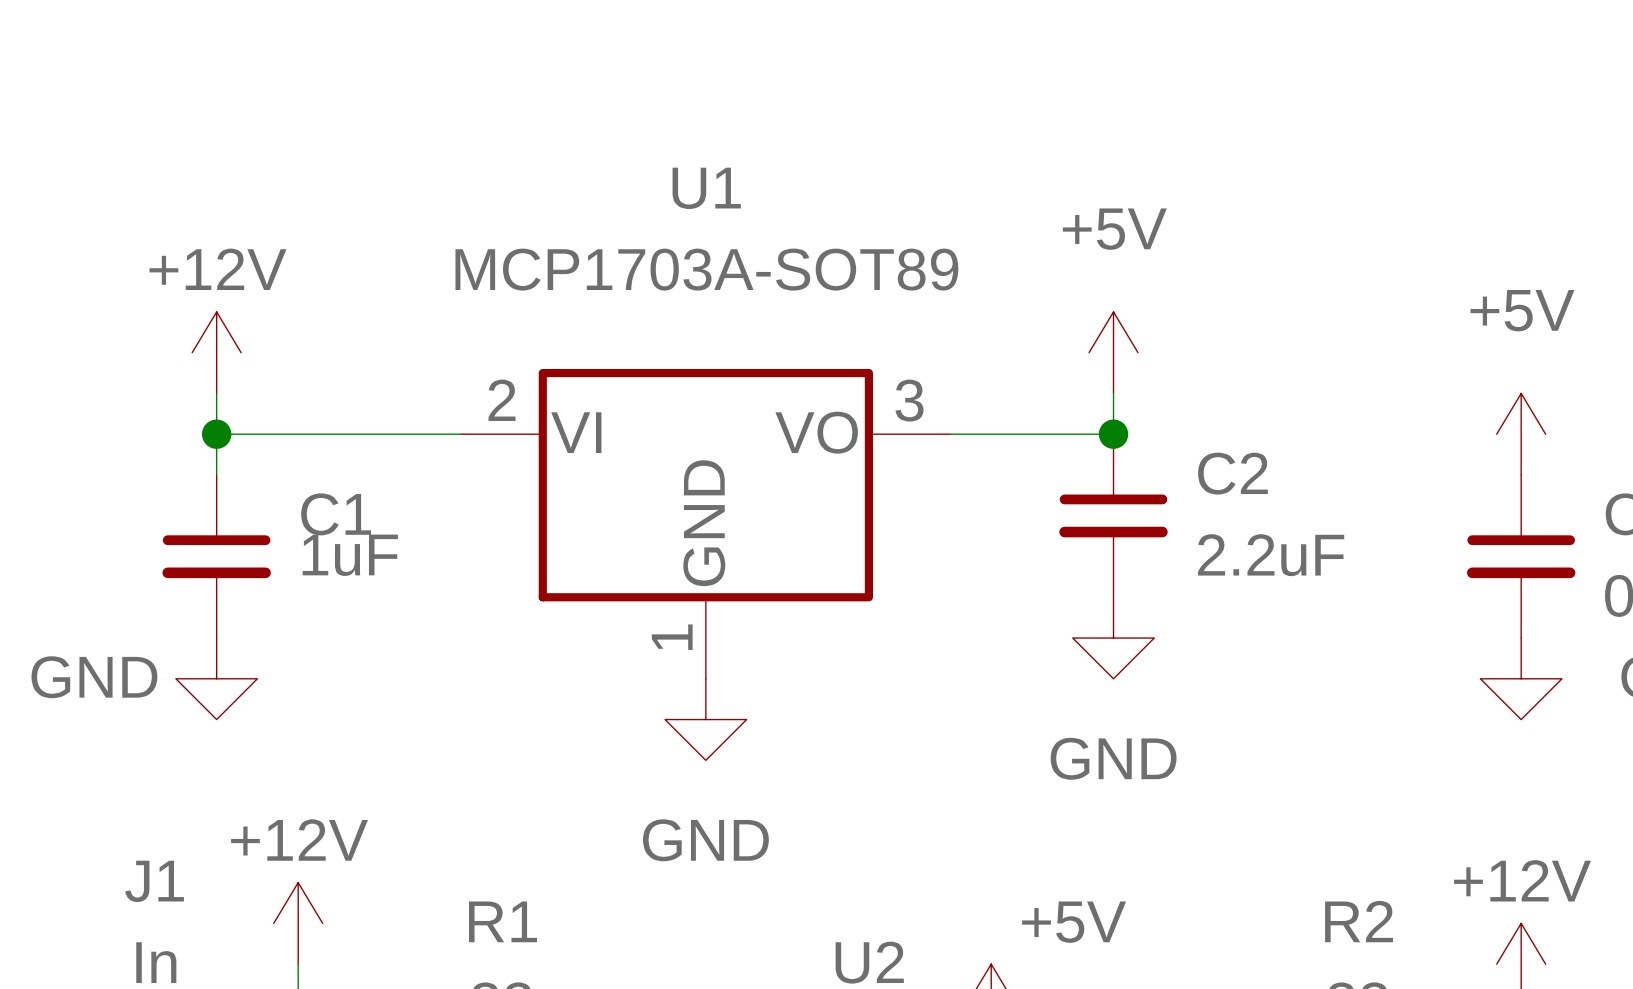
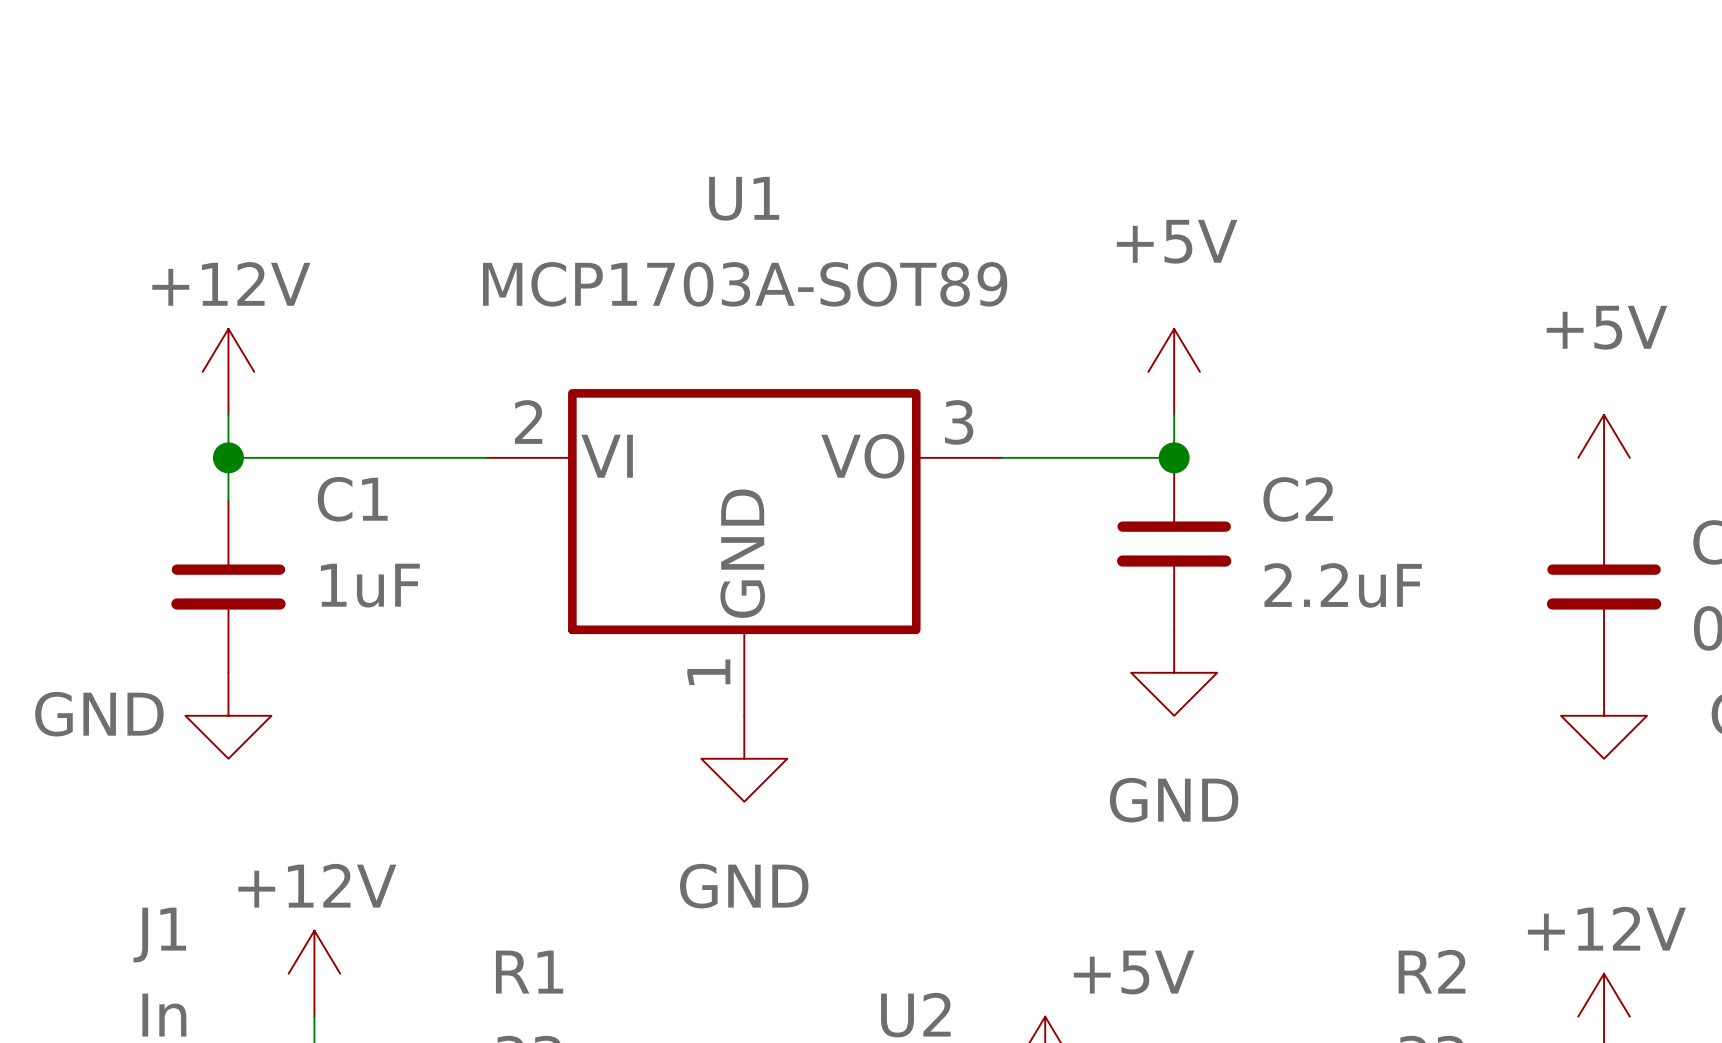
C1 name position: C1 (336, 514) -> C1 (352, 499)

